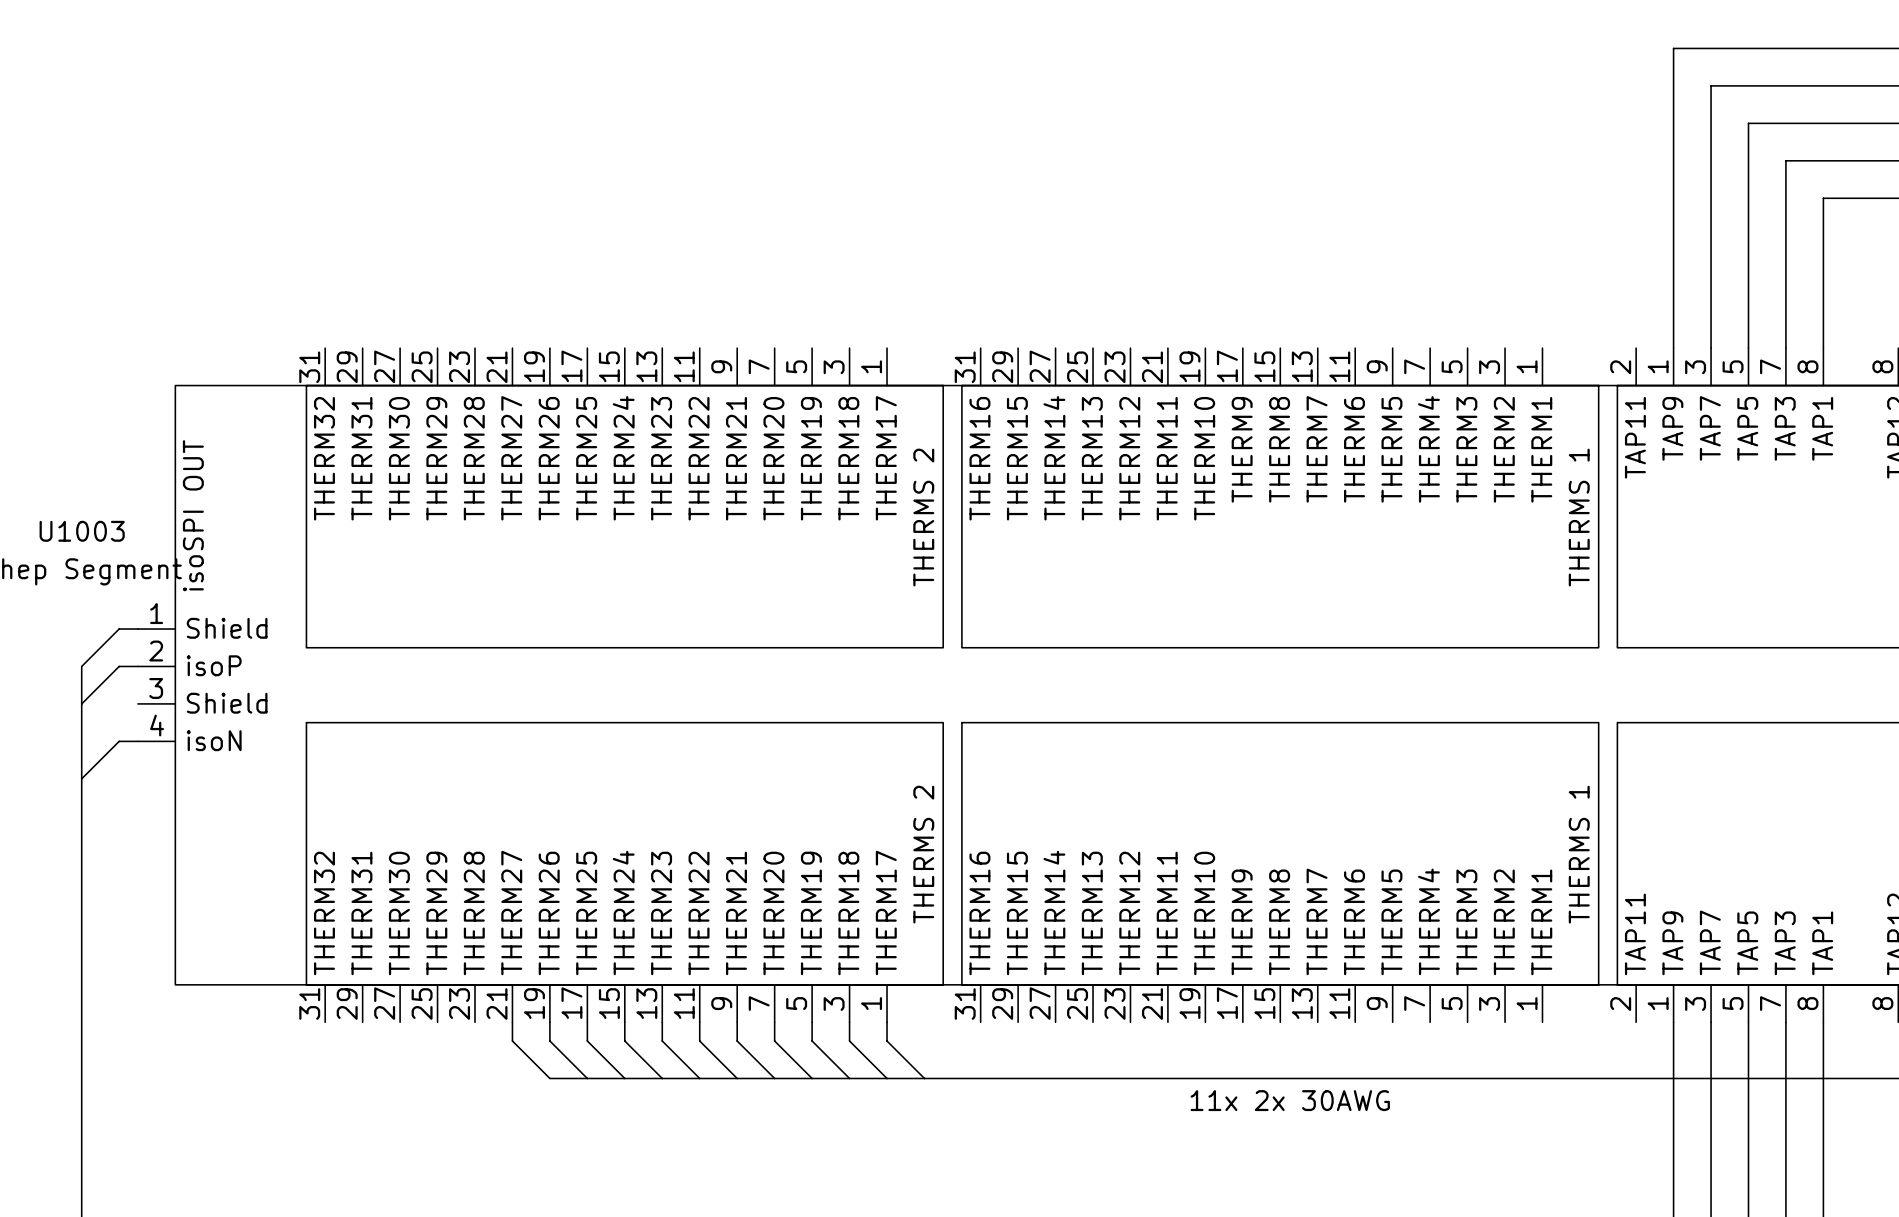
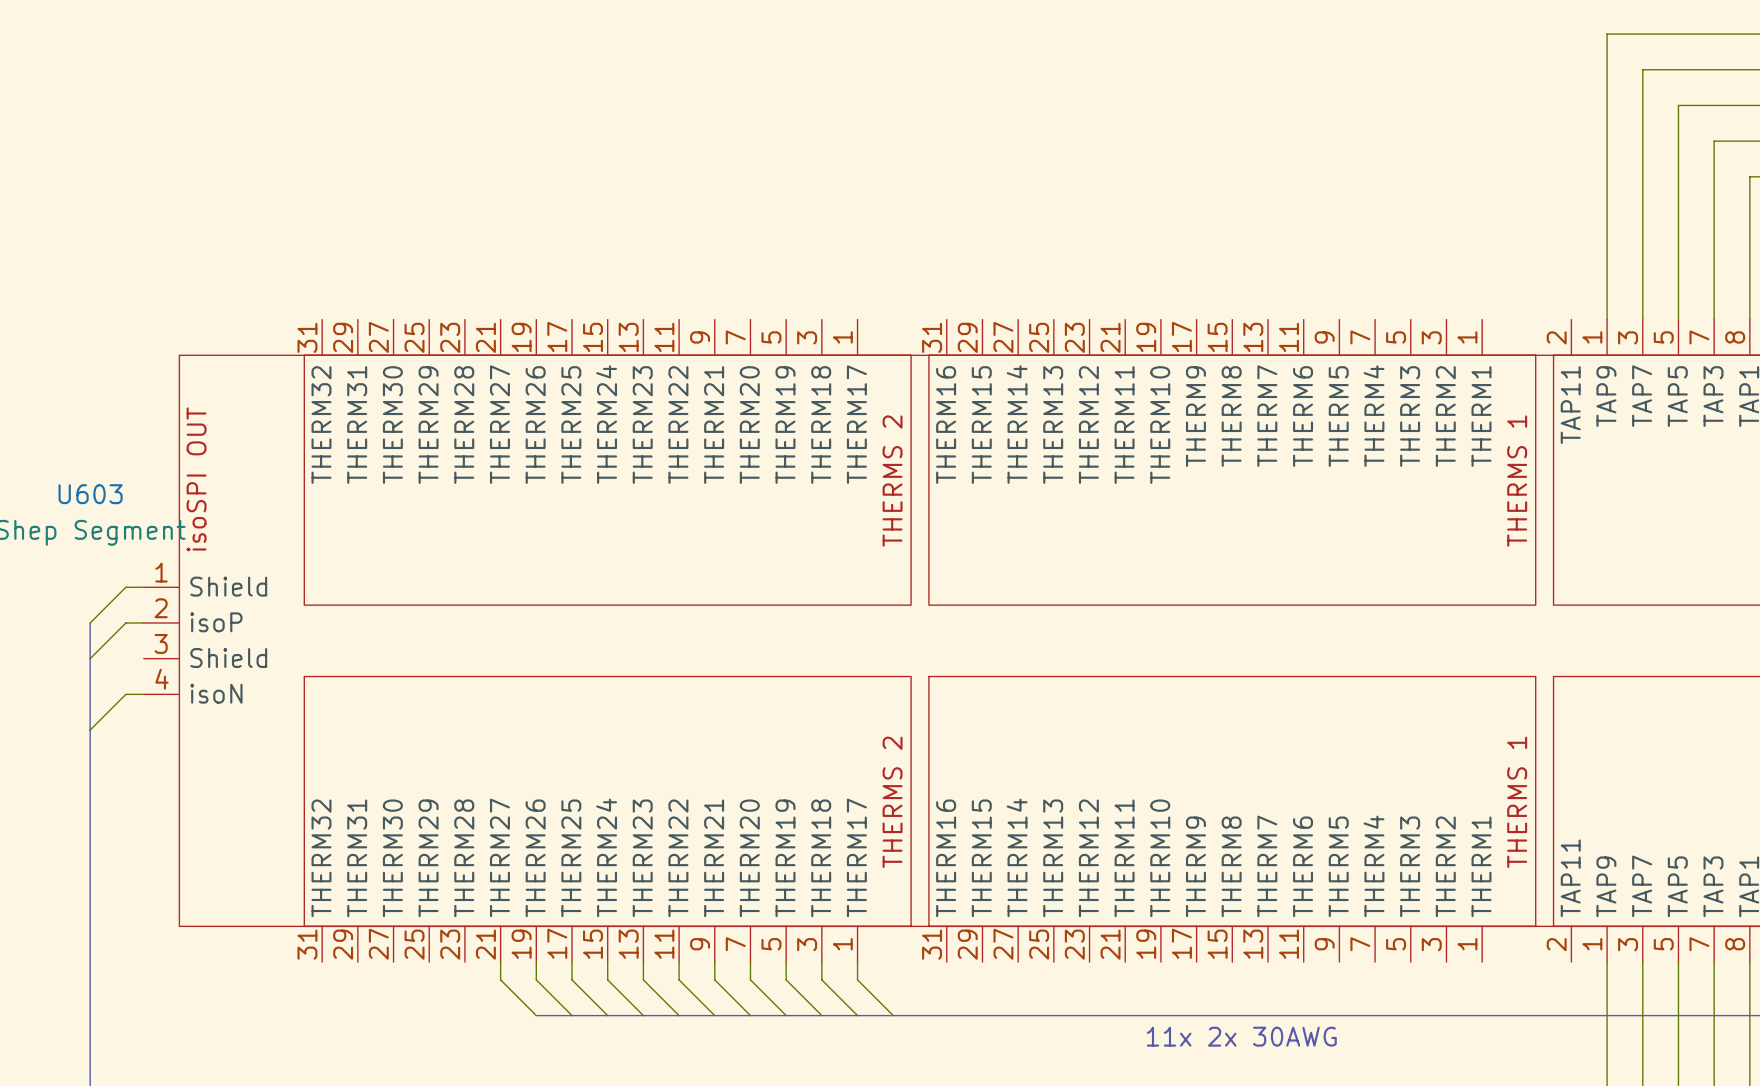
U1003 name: U1003 (82, 531) -> U603 (90, 494)

